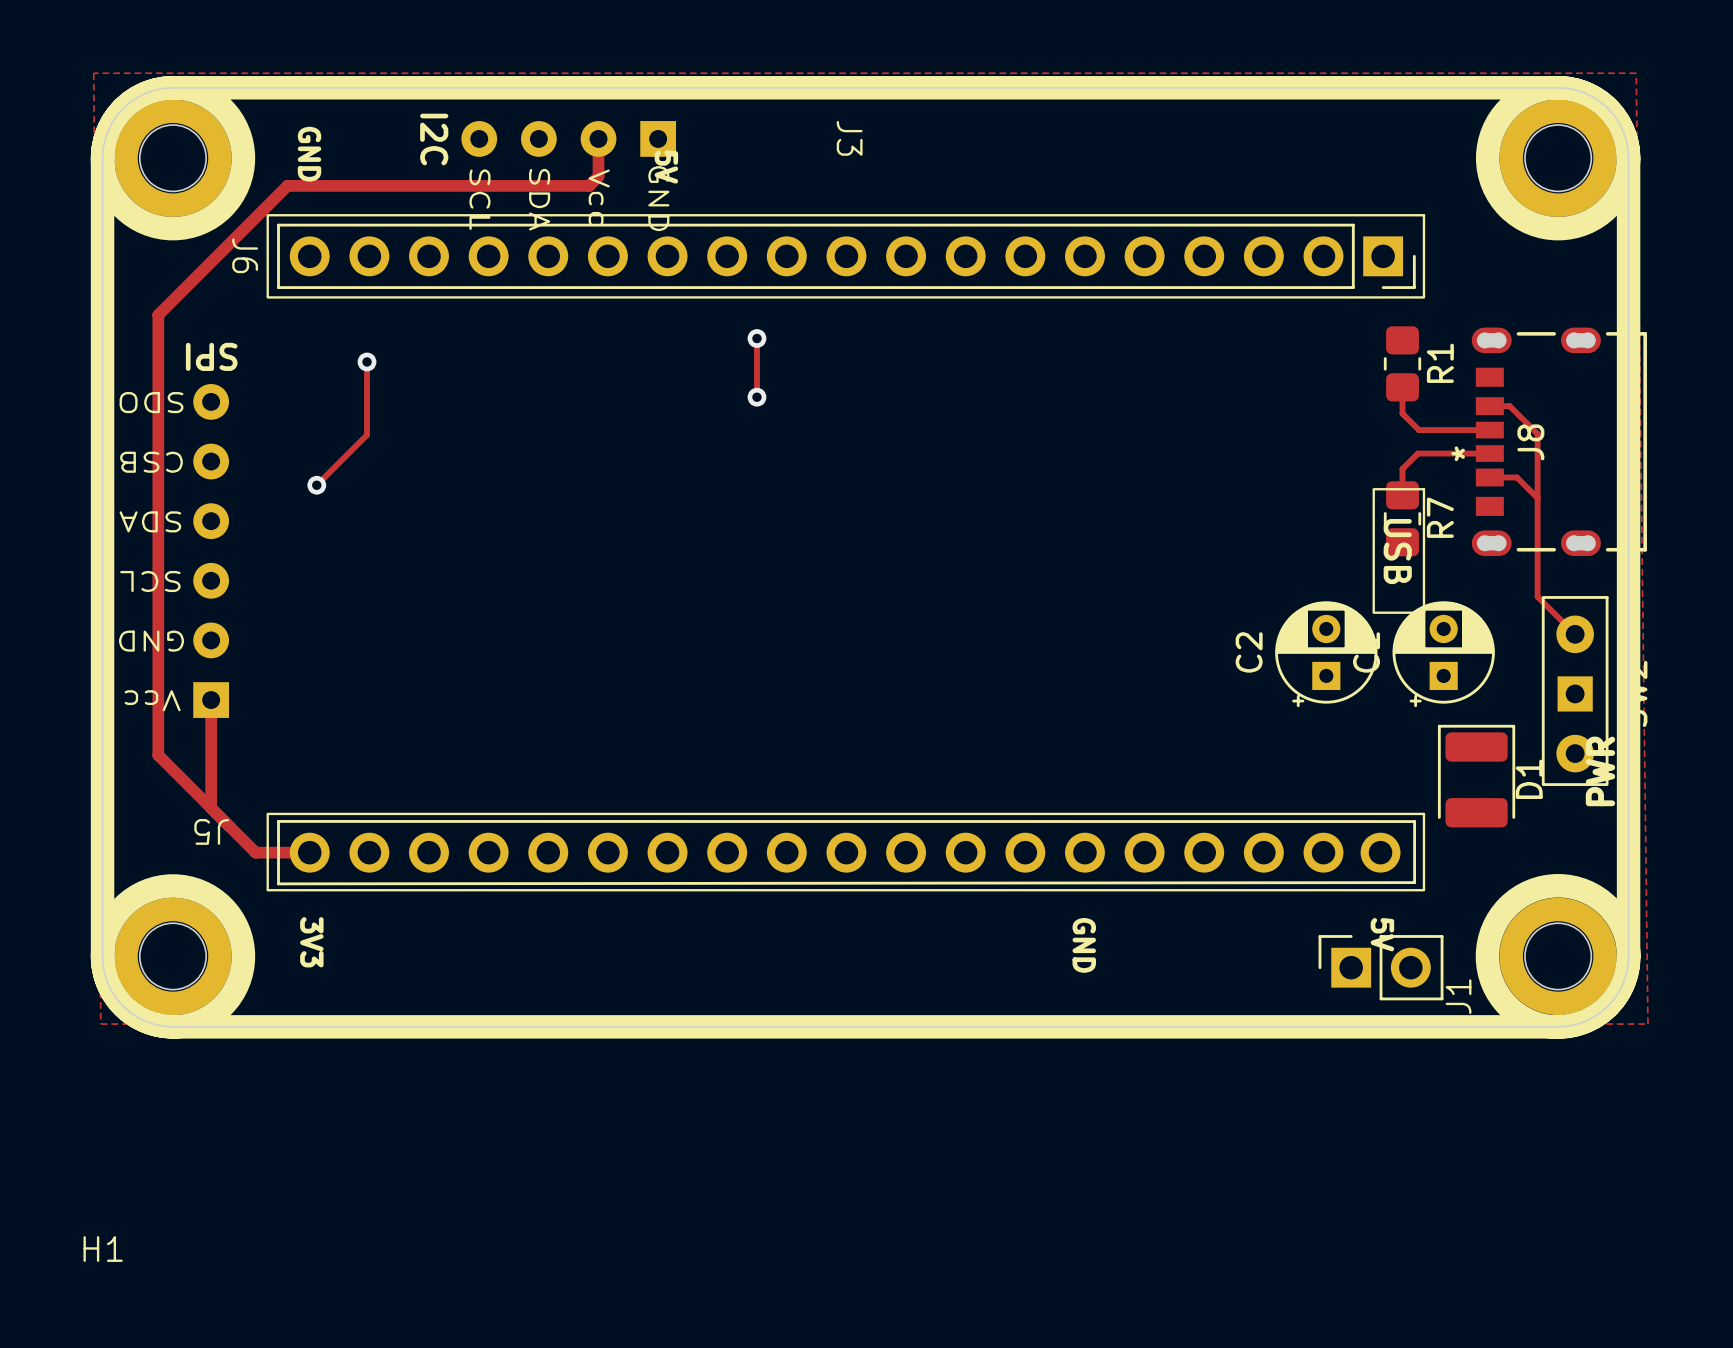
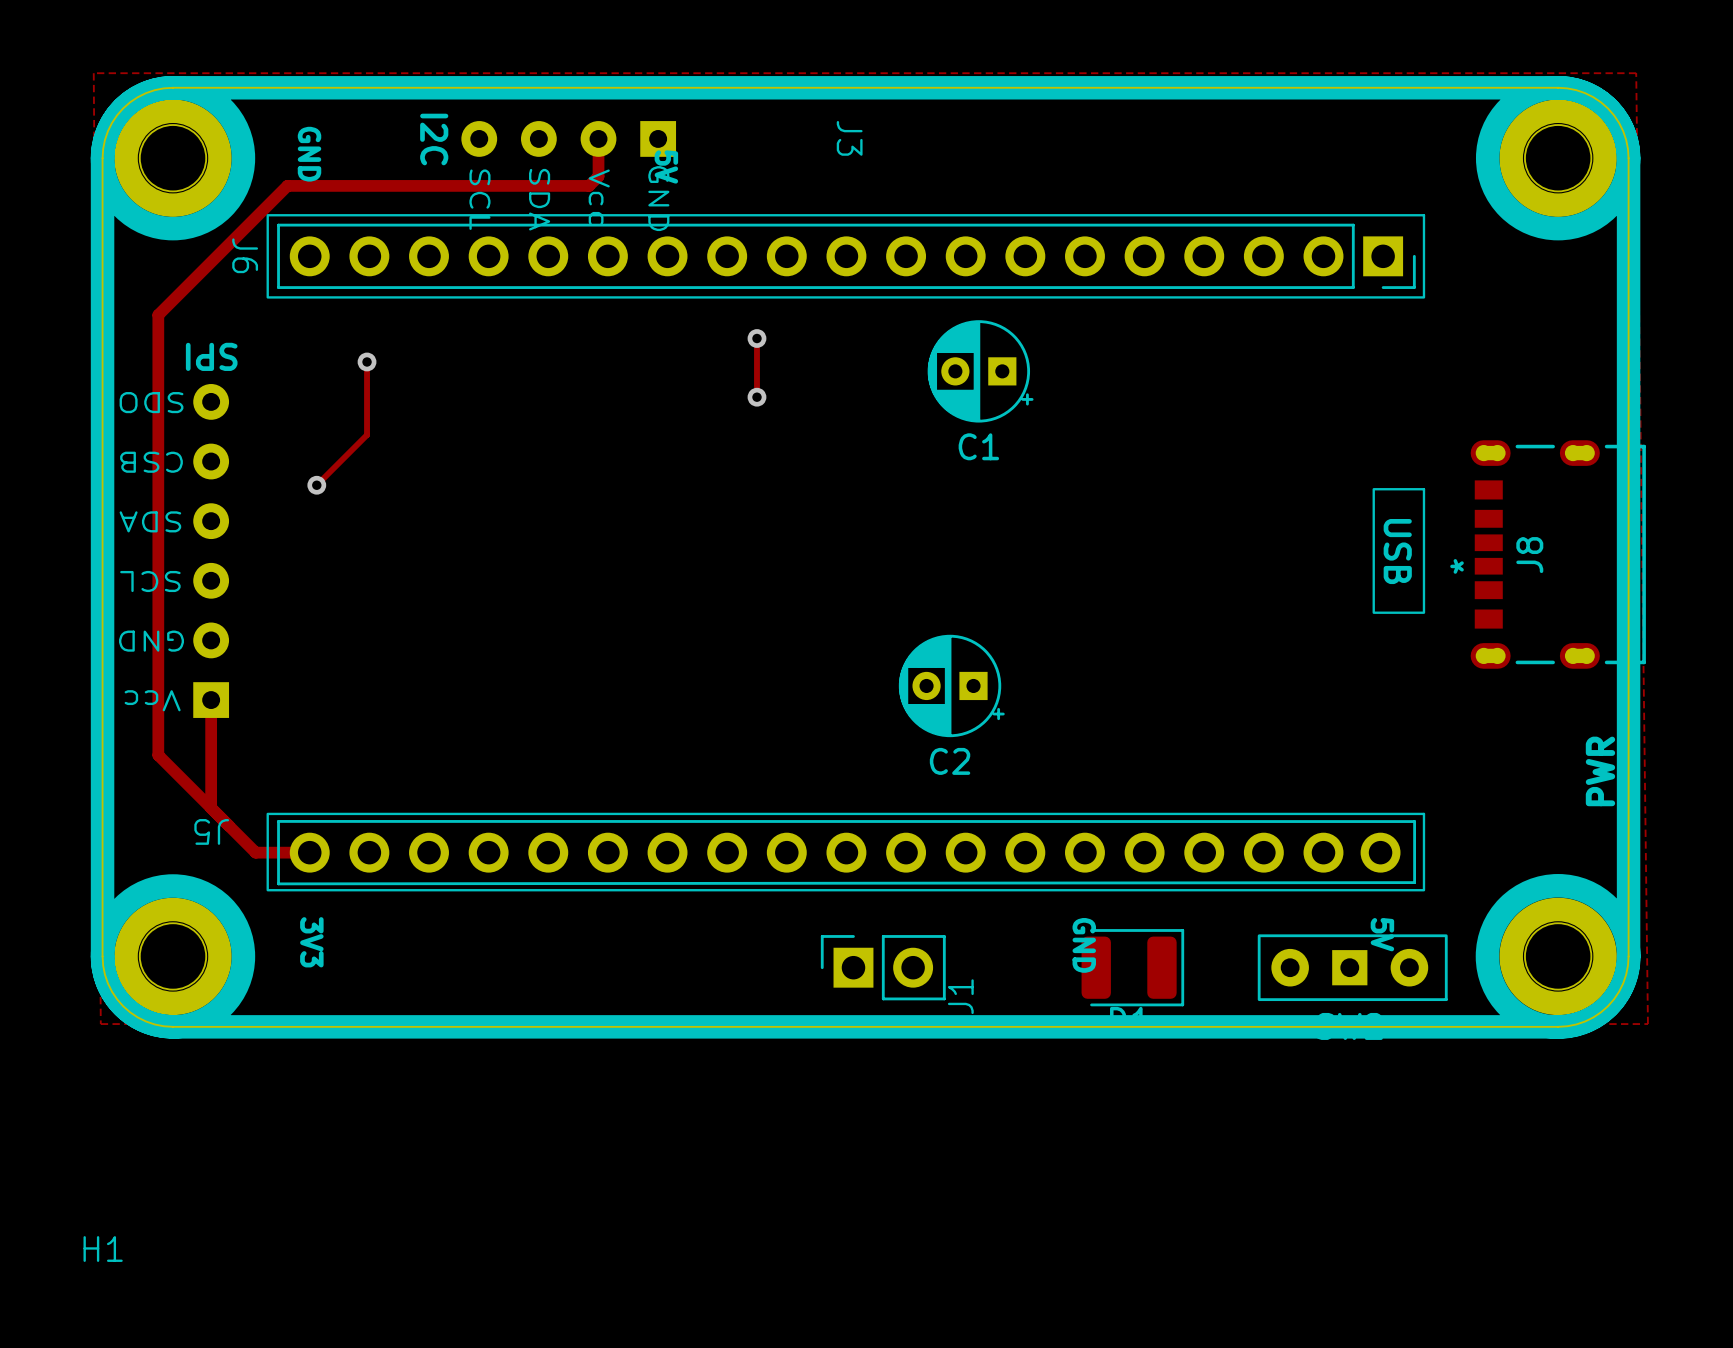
R1: (1402, 363) -> none
track: (1402, 387) (1402, 413) (1418, 430) (1489, 430) -> none
track: (1489, 406) (1509, 406) (1537, 434) (1537, 596) (1575, 634) -> none
J8 position: (1559, 441) -> (1558, 554)
track: (1489, 453) (1417, 453) (1402, 468) (1402, 495) -> none
track: (1489, 477) (1516, 477) (1537, 498) -> none
R7: (1402, 518) -> none
C2 rotation: 0° (1326, 654) -> 90° counterclockwise (951, 685)
C2 position: (1326, 654) -> (951, 685)
C1 rotation: 0° (1443, 654) -> 90° counterclockwise (980, 371)
C1 position: (1443, 654) -> (980, 371)
part rotation: 0° (1575, 691) -> 90° clockwise (1352, 967)
part position: (1575, 691) -> (1352, 967)
D1 rotation: 0° (1476, 776) -> 90° clockwise (1132, 967)
D1 position: (1476, 776) -> (1132, 967)
J1 position: (1381, 967) -> (883, 967)

